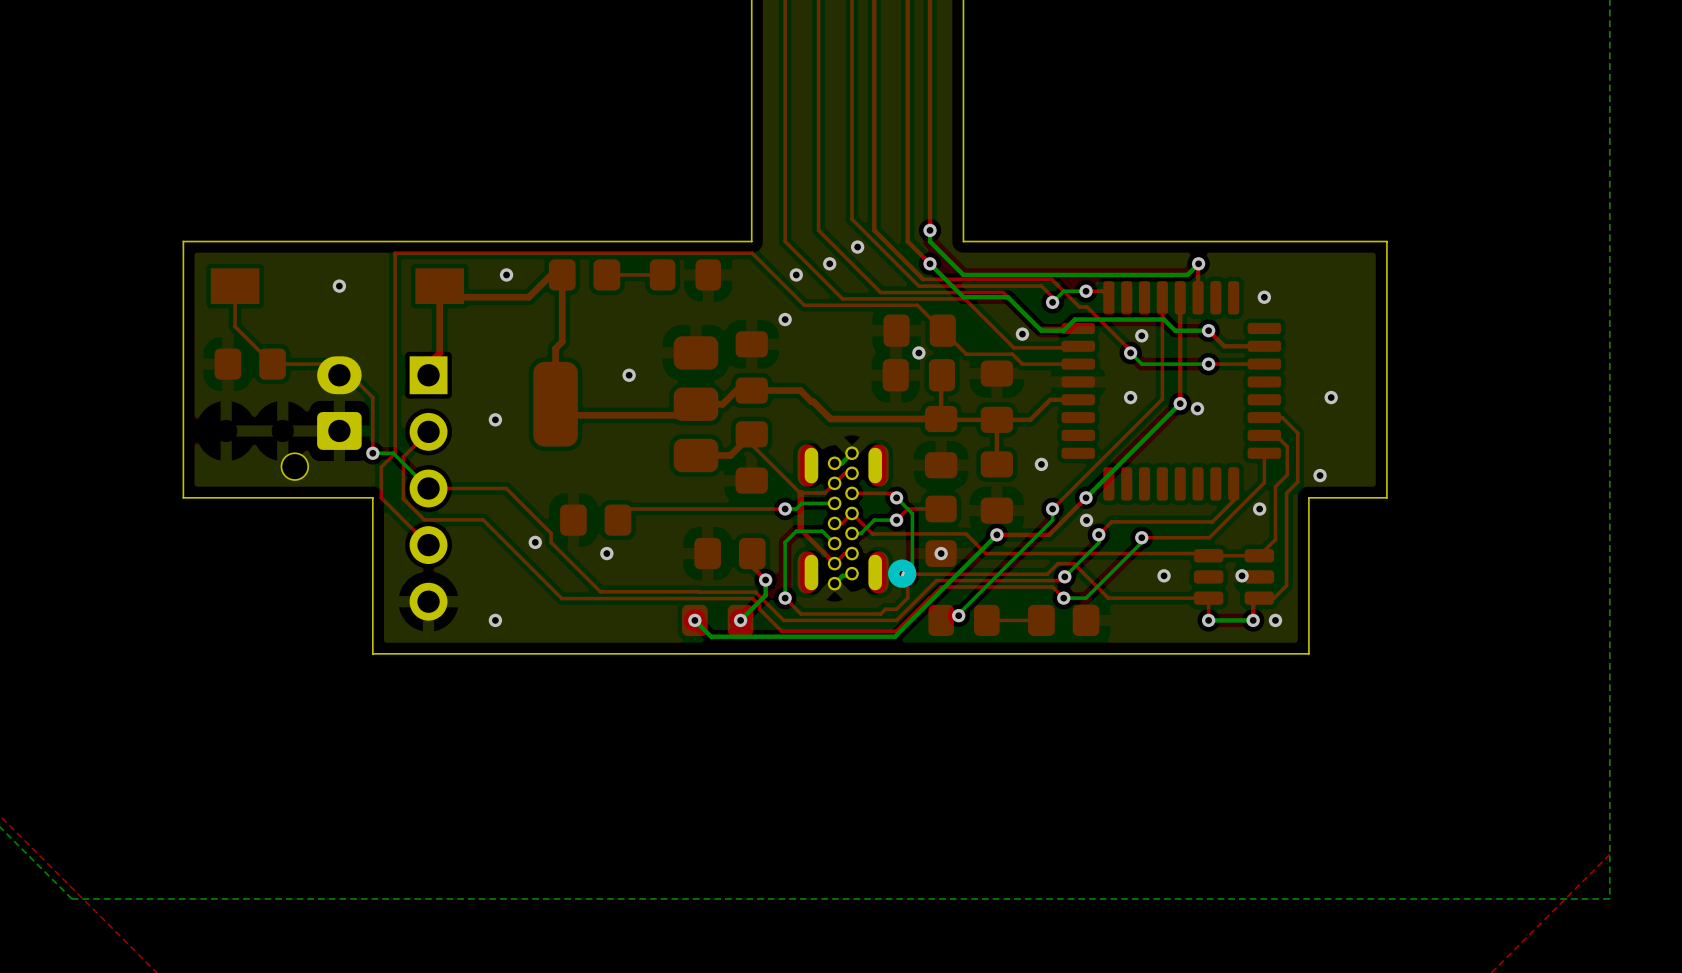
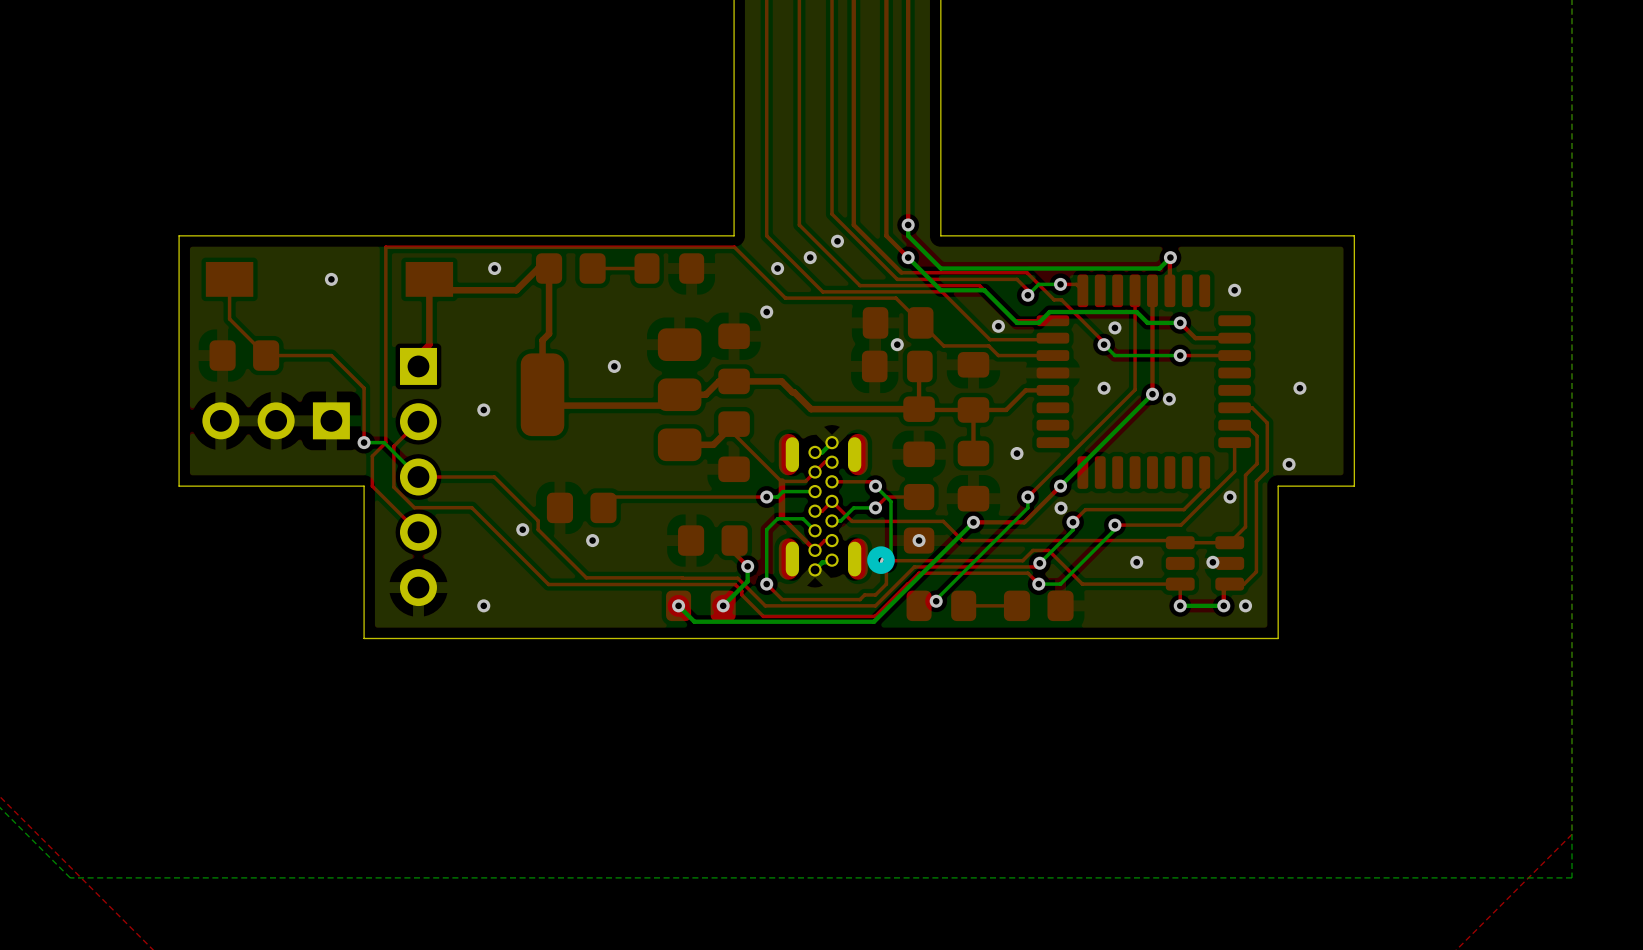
part: (321, 418) -> none
part: none -> (276, 420)

